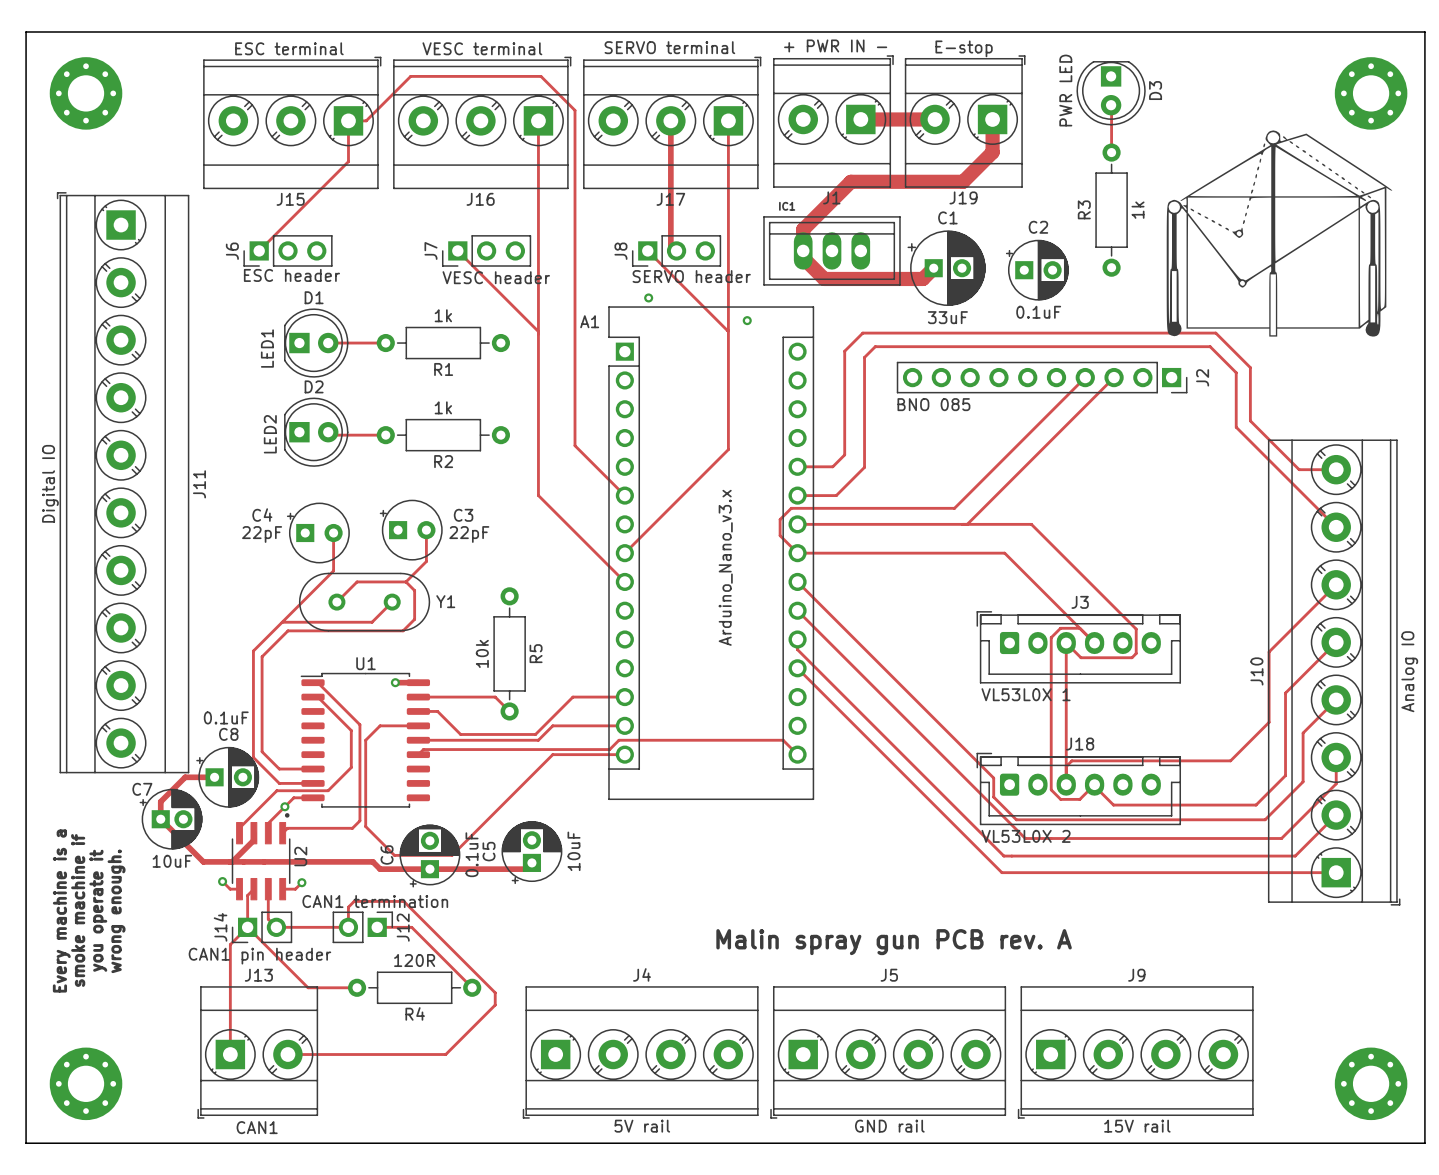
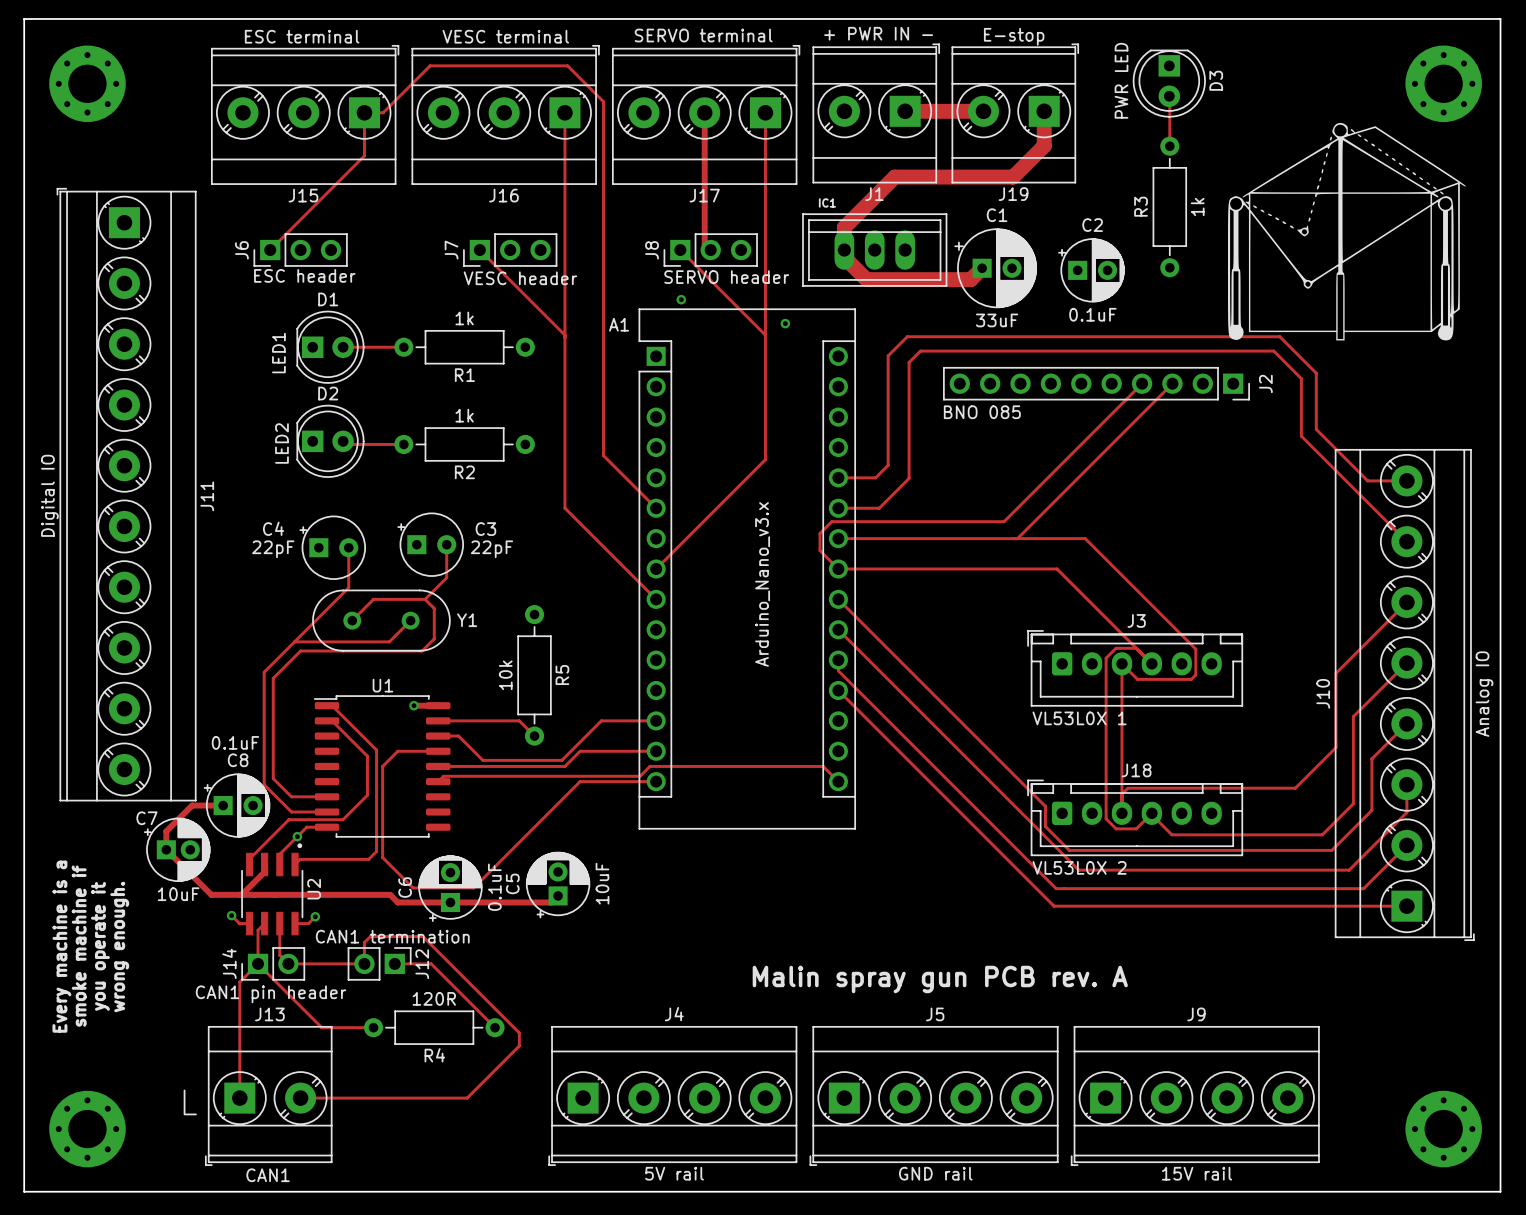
text: none -> L (190, 1102)

